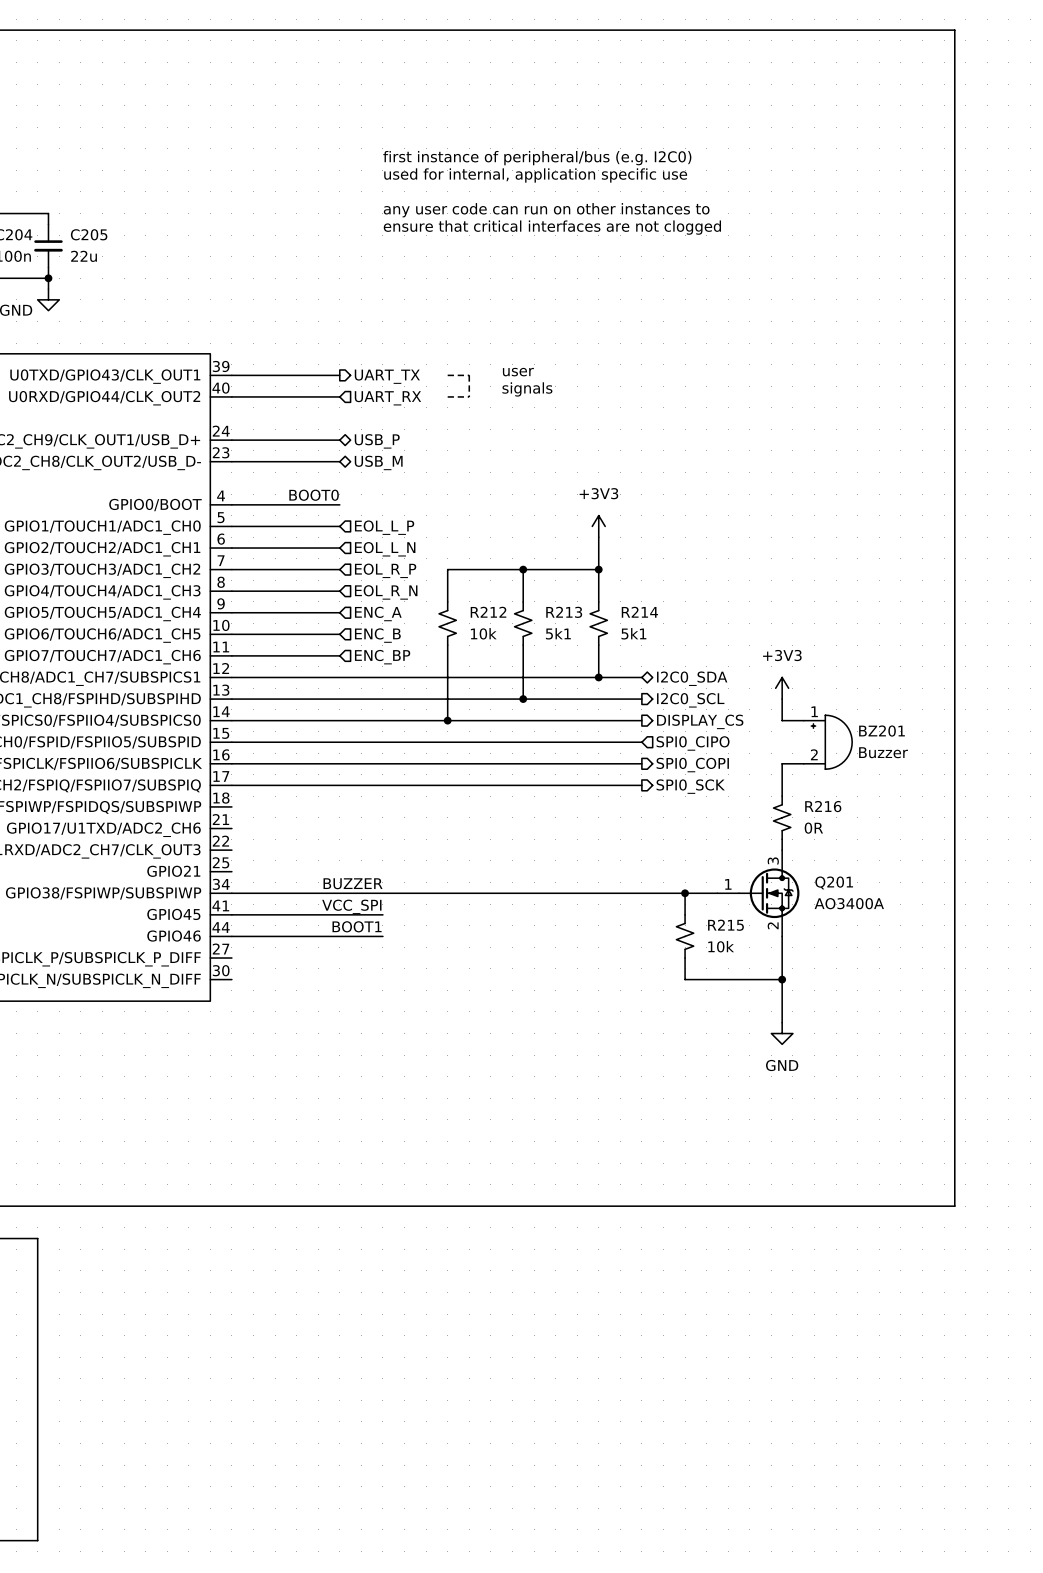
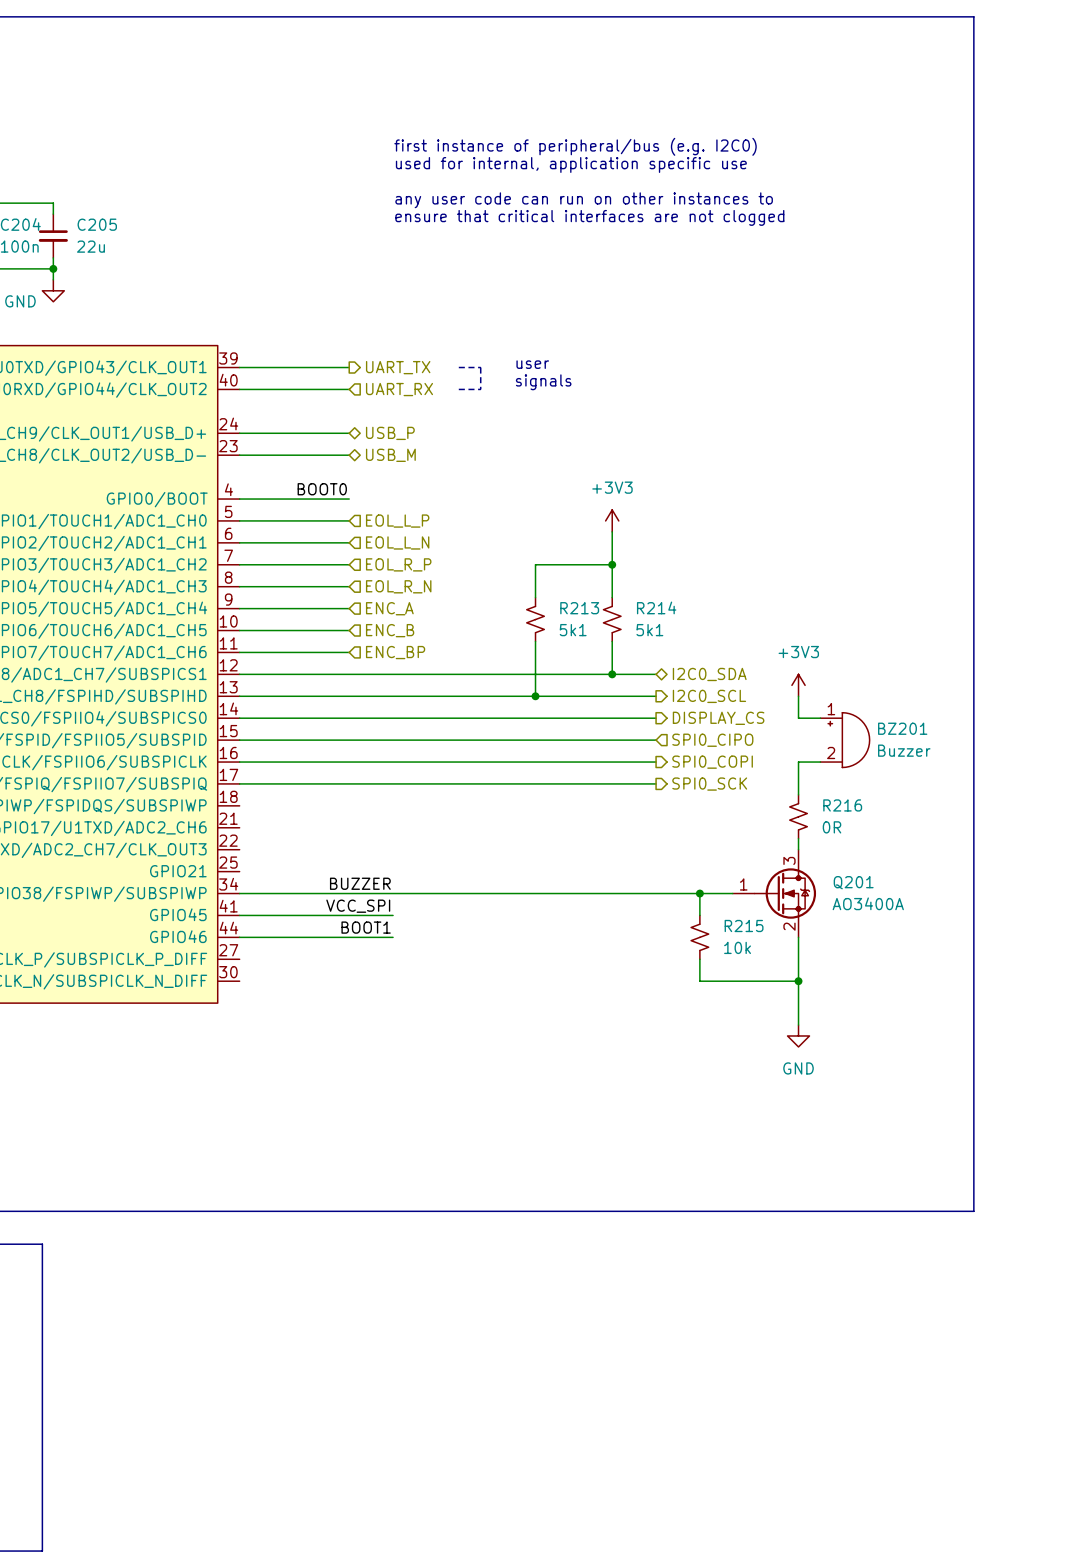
wire: (523, 569) (447, 569) (447, 601) -> none
junction: (523, 569) -> none
R212: 10k (447, 623) -> none
wire: (447, 645) (447, 720) -> none
junction: (447, 720) -> none

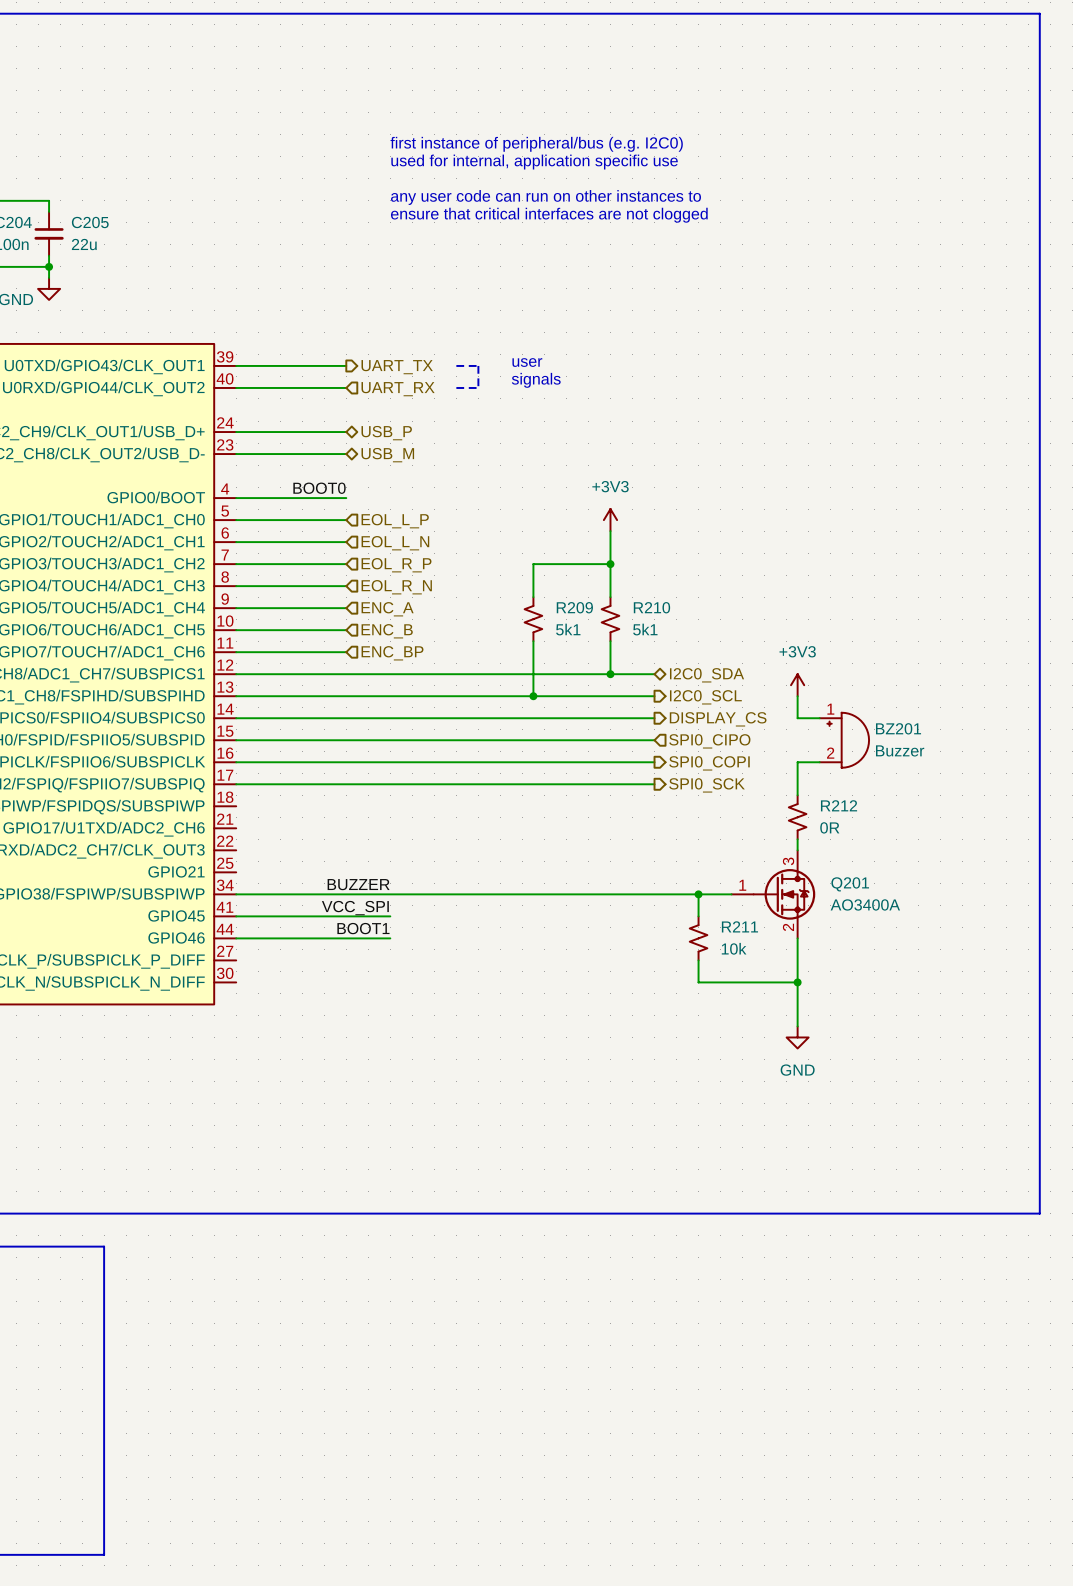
line: (973, 16) (973, 1211) -> (973, 13) (1039, 13) (1039, 1213) (973, 1213)
R214 name: R214 (656, 607) -> R210 (651, 607)
R213 name: R213 (579, 608) -> R209 (574, 607)
R216 name: R216 (842, 805) -> R212 (839, 805)
R215 name: R215 (744, 925) -> R211 (739, 926)
line: (42, 1244) (42, 1551) -> (38, 1246) (104, 1246) (104, 1554) (38, 1554)

